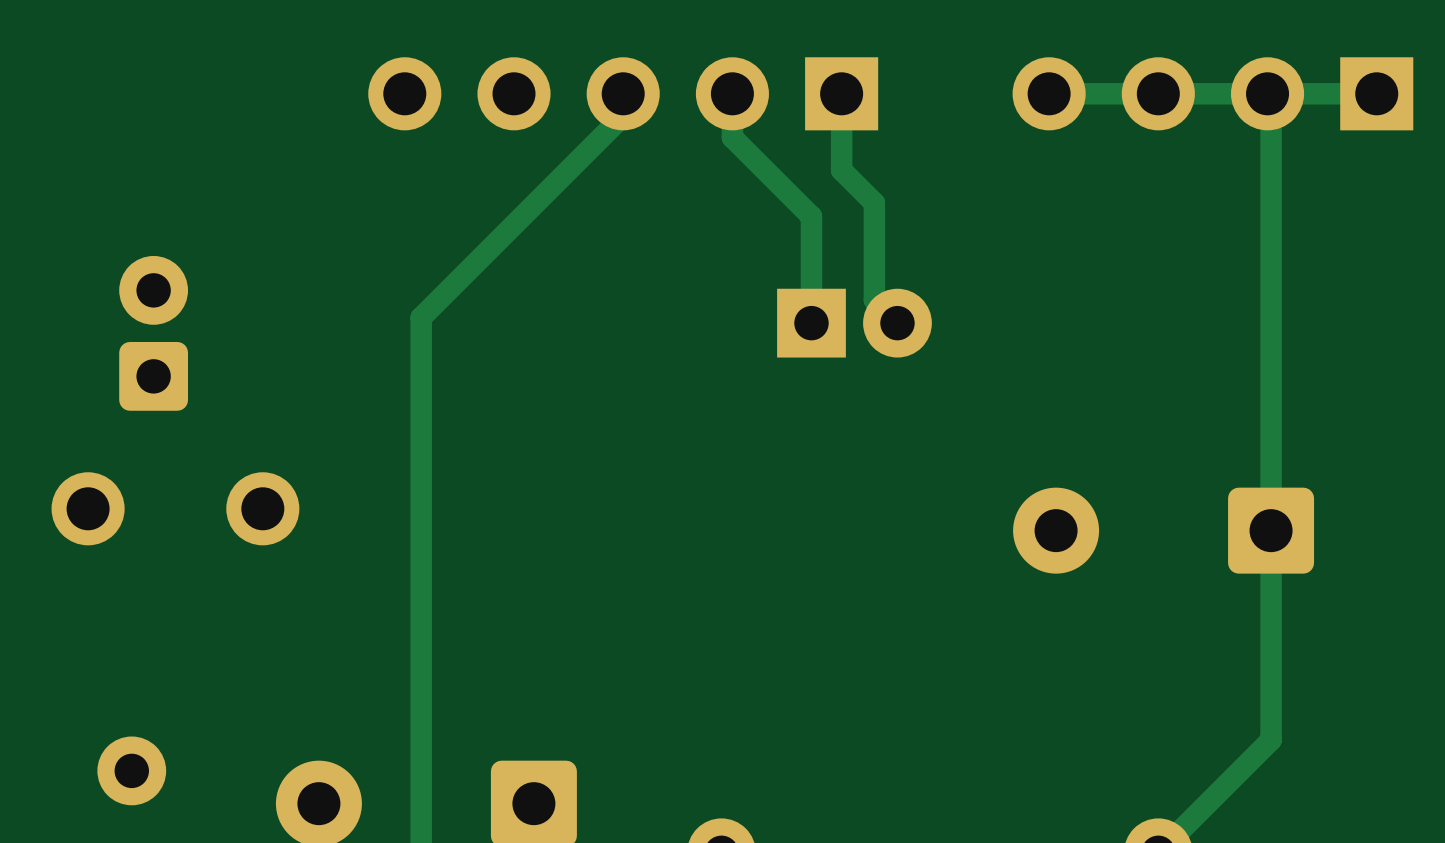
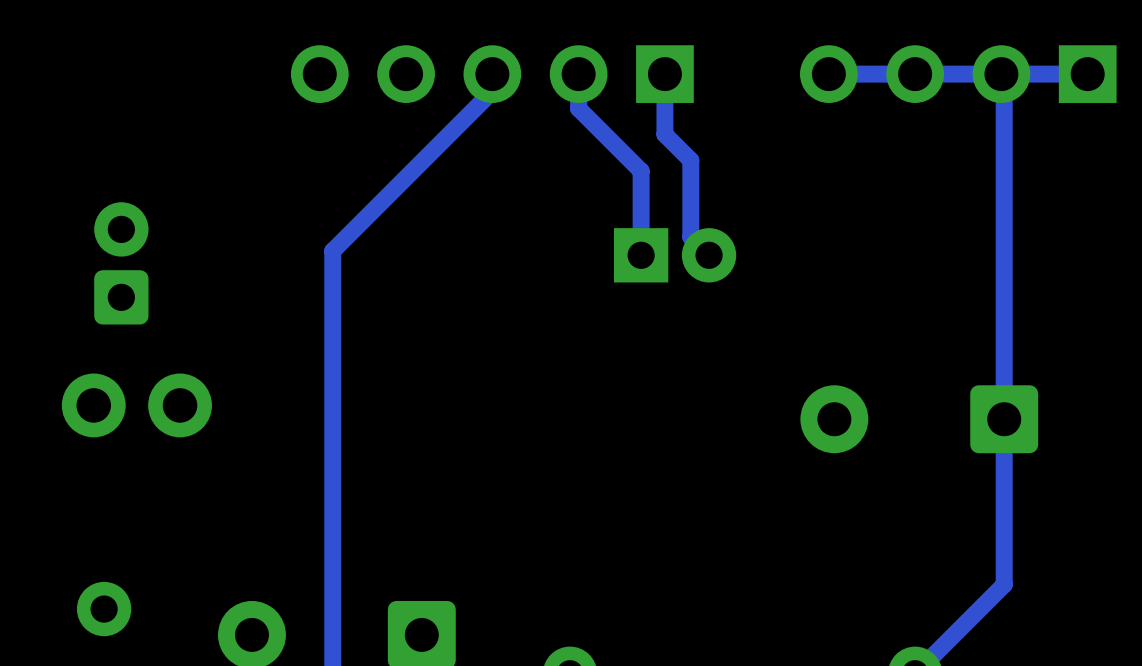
part: (88, 508) -> none
part: (262, 508) -> none
part: none -> (136, 405)

